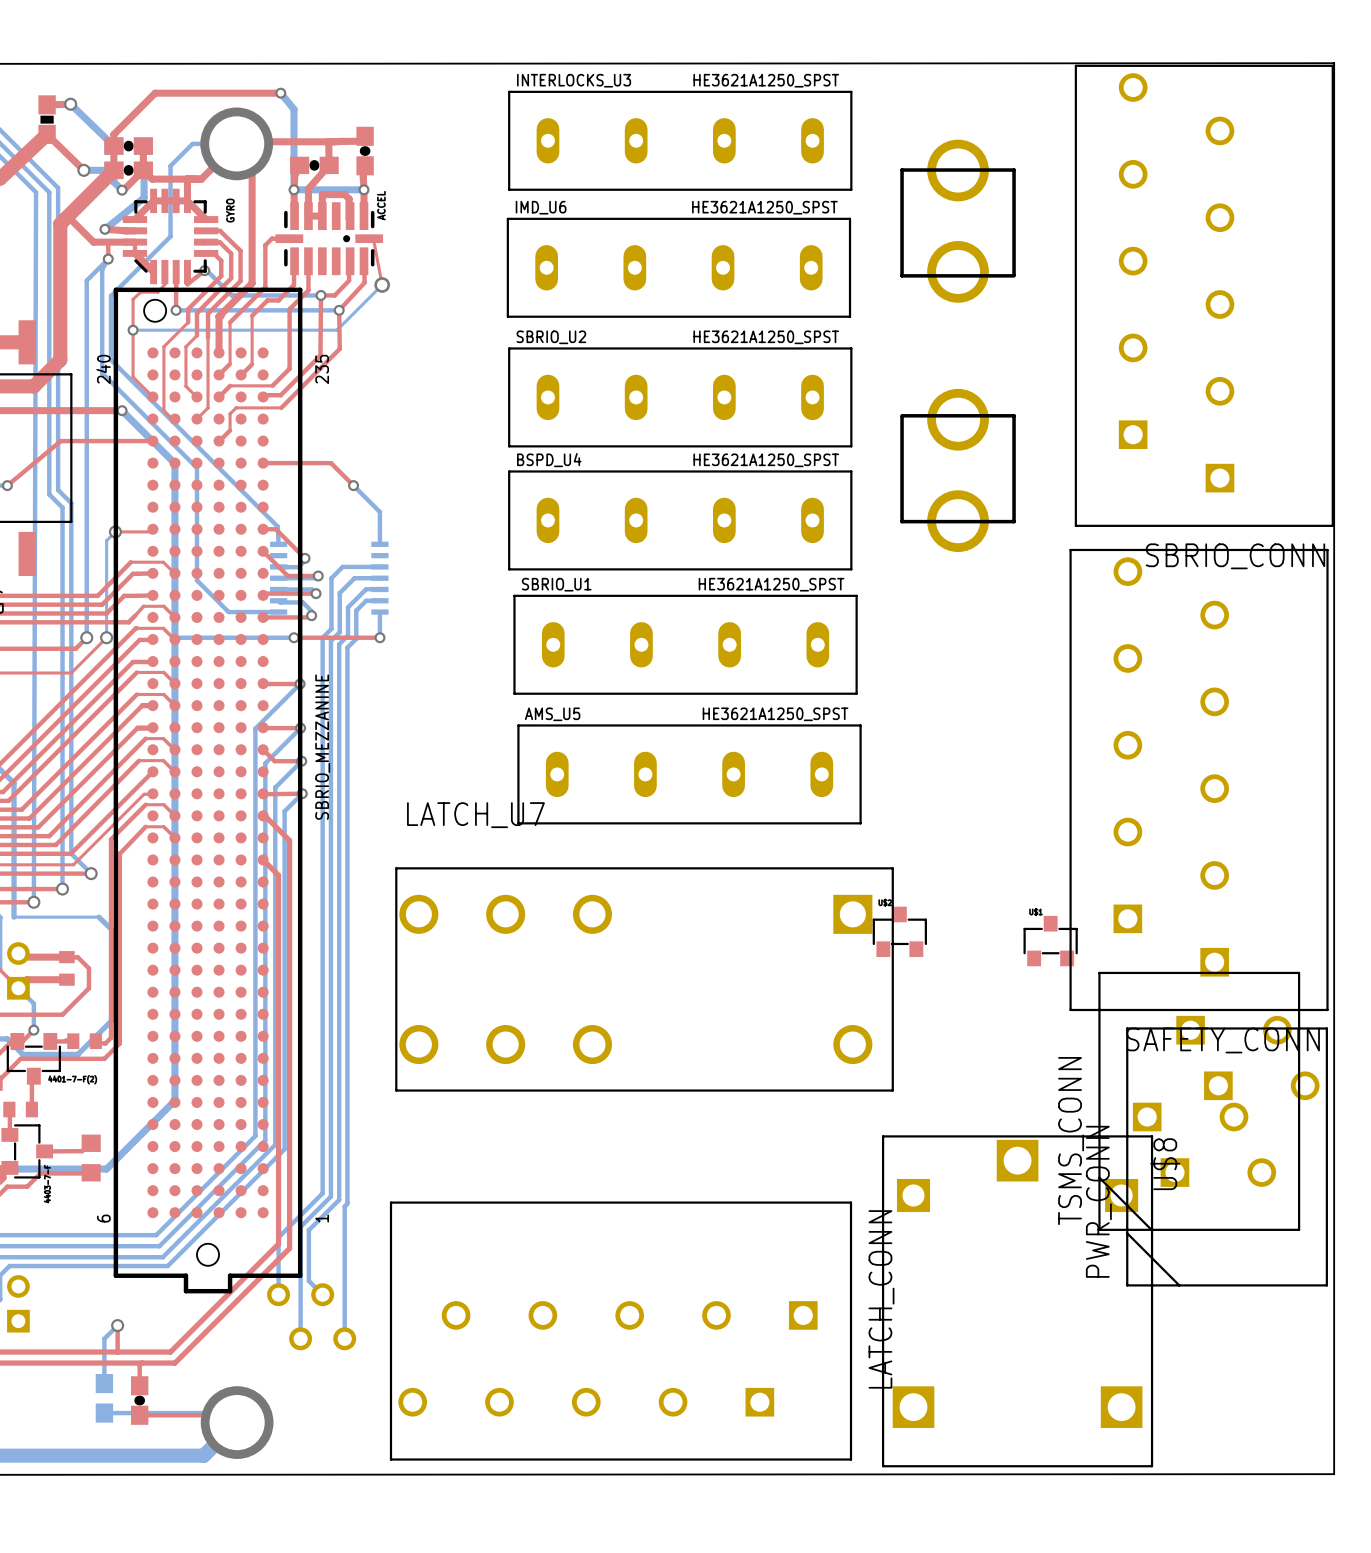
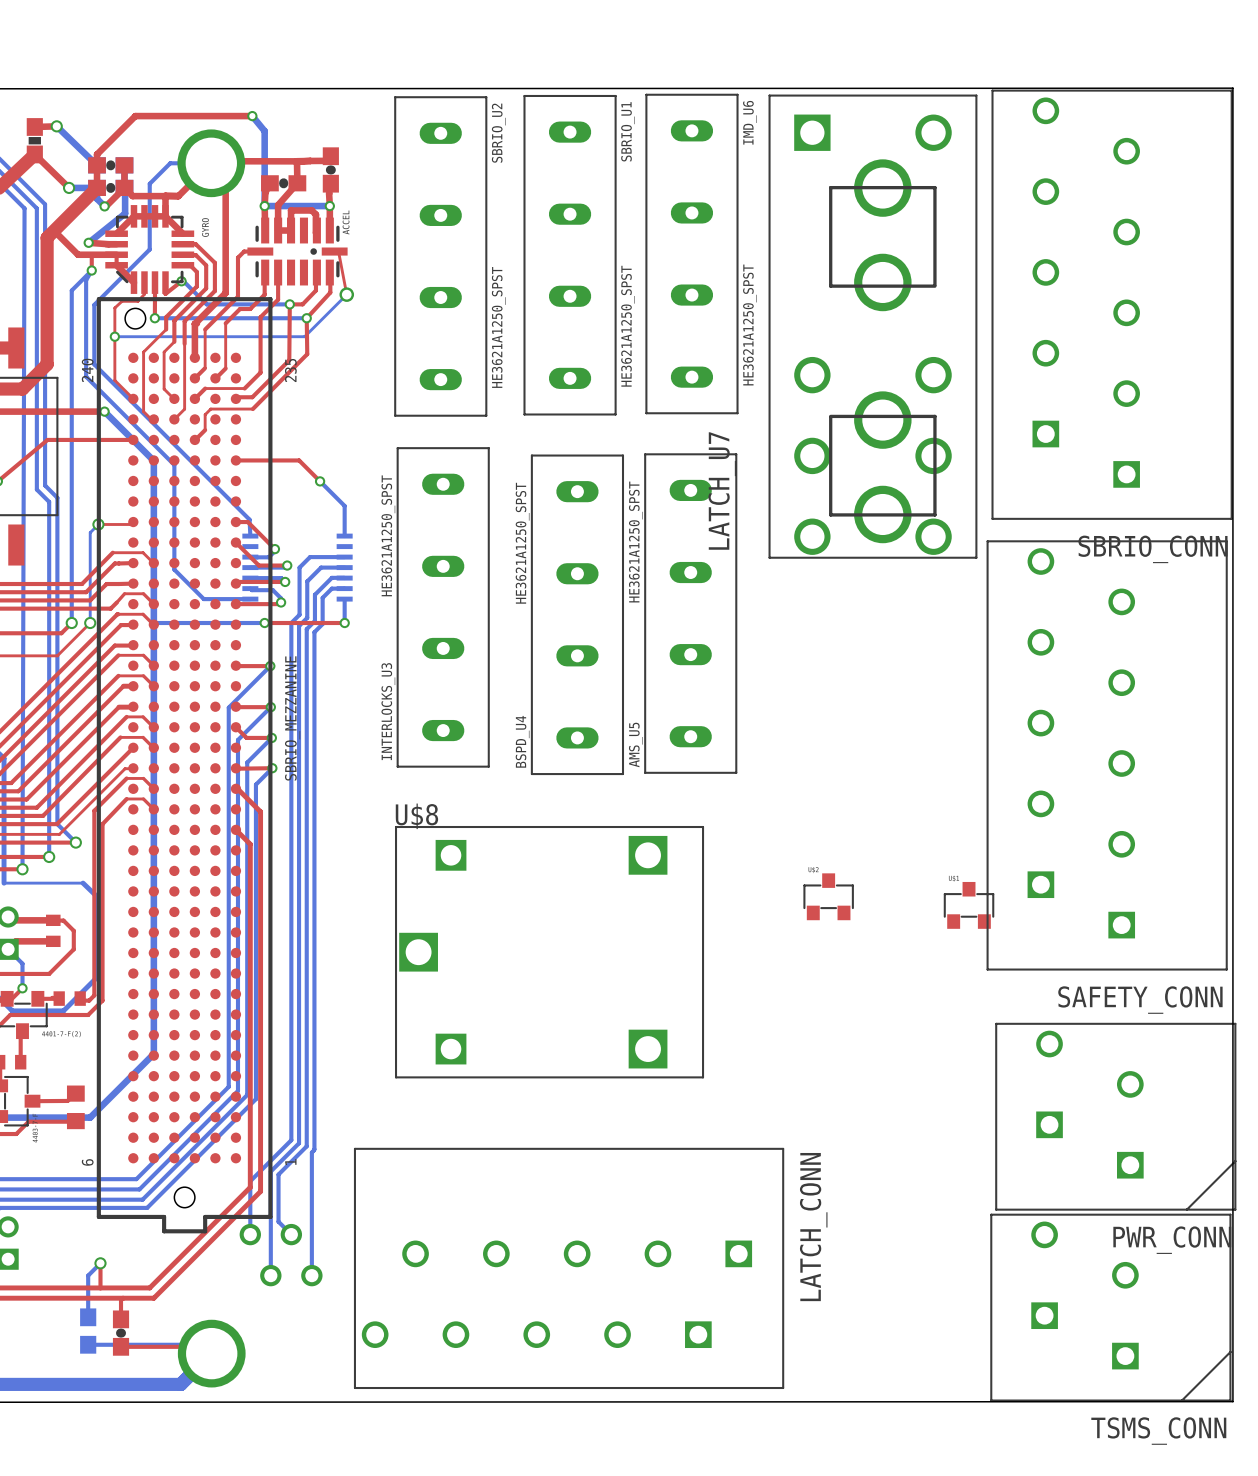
INTERLOCKS_U3 name position: INTERLOCKS_U3 (574, 80) -> INTERLOCKS_U3 (388, 711)
INTERLOCKS_U3 value position: HE3621A1250_SPST (766, 80) -> HE3621A1250_SPST (388, 535)
INTERLOCKS_U3 rotation: 0° (680, 140) -> 90° clockwise (443, 607)
INTERLOCKS_U3 position: (680, 140) -> (443, 607)
IMD_U6 rotation: 0° (678, 267) -> 90° clockwise (691, 254)
SBRIO_U2 rotation: 0° (680, 397) -> 90° clockwise (440, 256)
SBRIO_U2 position: (680, 397) -> (440, 256)
BSPD_U4 name position: BSPD_U4 (549, 460) -> BSPD_U4 (522, 741)
BSPD_U4 value position: HE3621A1250_SPST (766, 460) -> HE3621A1250_SPST (522, 543)
BSPD_U4 rotation: 0° (680, 520) -> 90° clockwise (577, 614)
SBRIO_U1 rotation: 0° (685, 644) -> 90° clockwise (570, 255)
SBRIO_U1 position: (685, 644) -> (570, 255)
AMS_U5 name position: AMS_U5 (552, 714) -> AMS_U5 (635, 744)
AMS_U5 value position: HE3621A1250_SPST (775, 714) -> HE3621A1250_SPST (635, 542)
AMS_U5 rotation: 0° (689, 774) -> 90° clockwise (690, 613)
LATCH_U7 rotation: 0° (644, 979) -> 90° counterclockwise (872, 326)
LATCH_U7 position: (644, 979) -> (872, 326)
TSMS_CONN rotation: 0° (1199, 1101) -> 90° counterclockwise (1110, 1307)
TSMS_CONN position: (1199, 1101) -> (1110, 1307)
PWR_CONN rotation: 0° (1227, 1156) -> 90° counterclockwise (1115, 1116)
U$8 rotation: 0° (1017, 1301) -> 90° counterclockwise (549, 952)
U$8 position: (1017, 1301) -> (549, 952)

